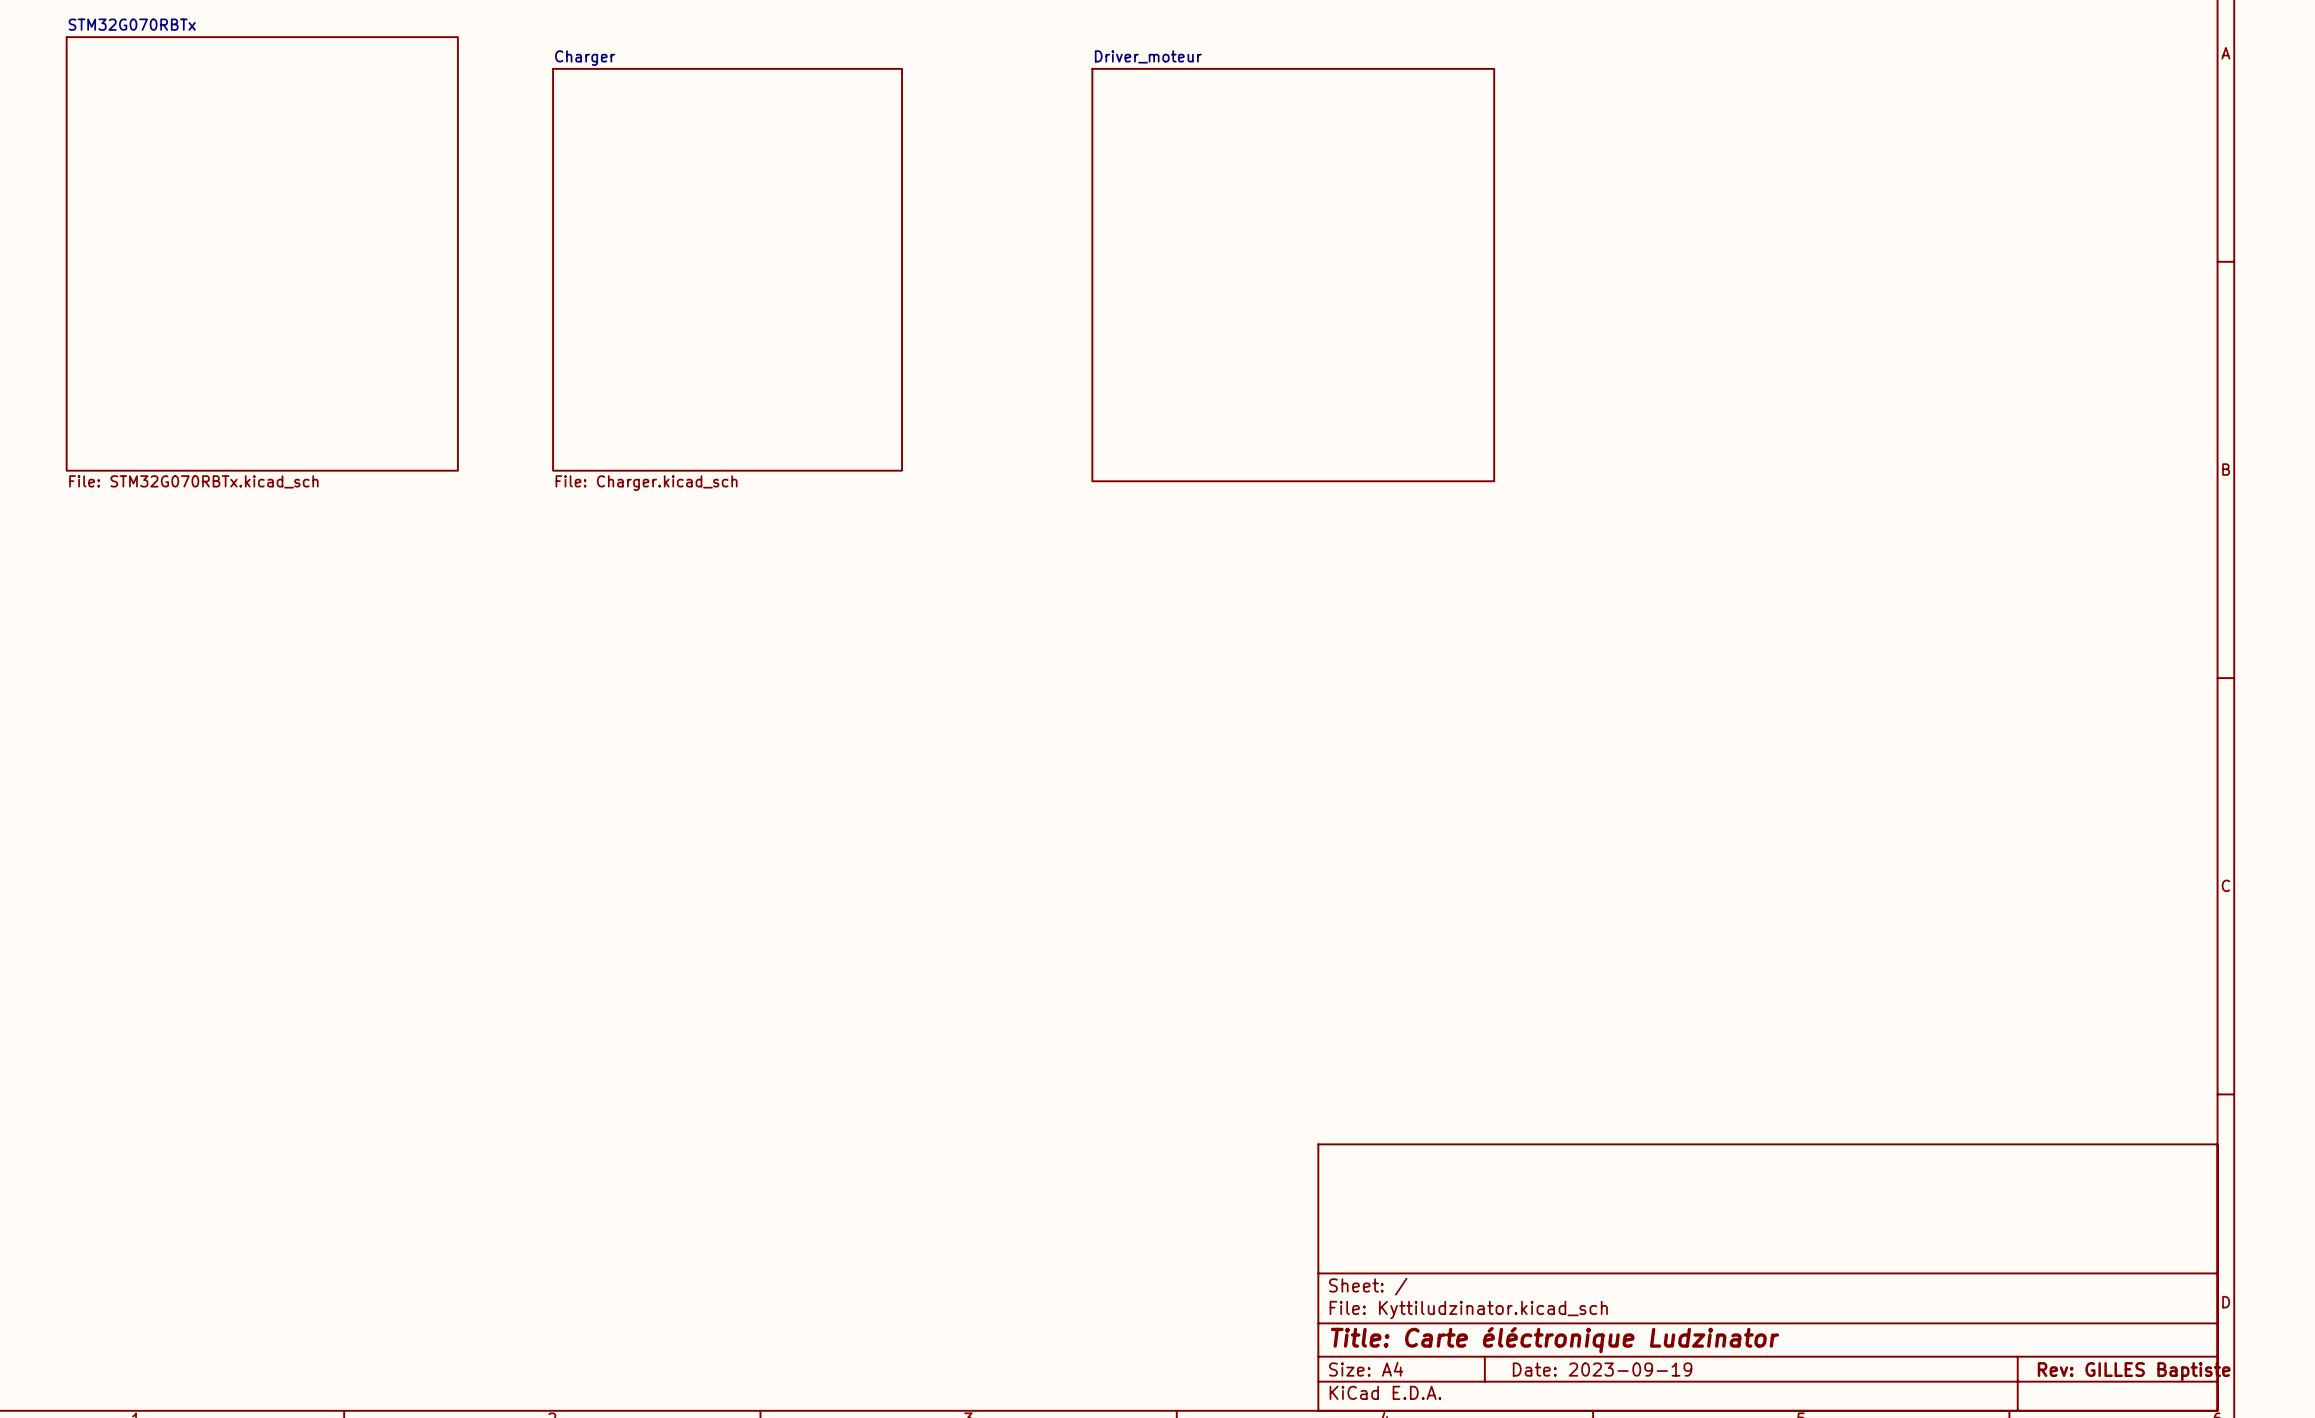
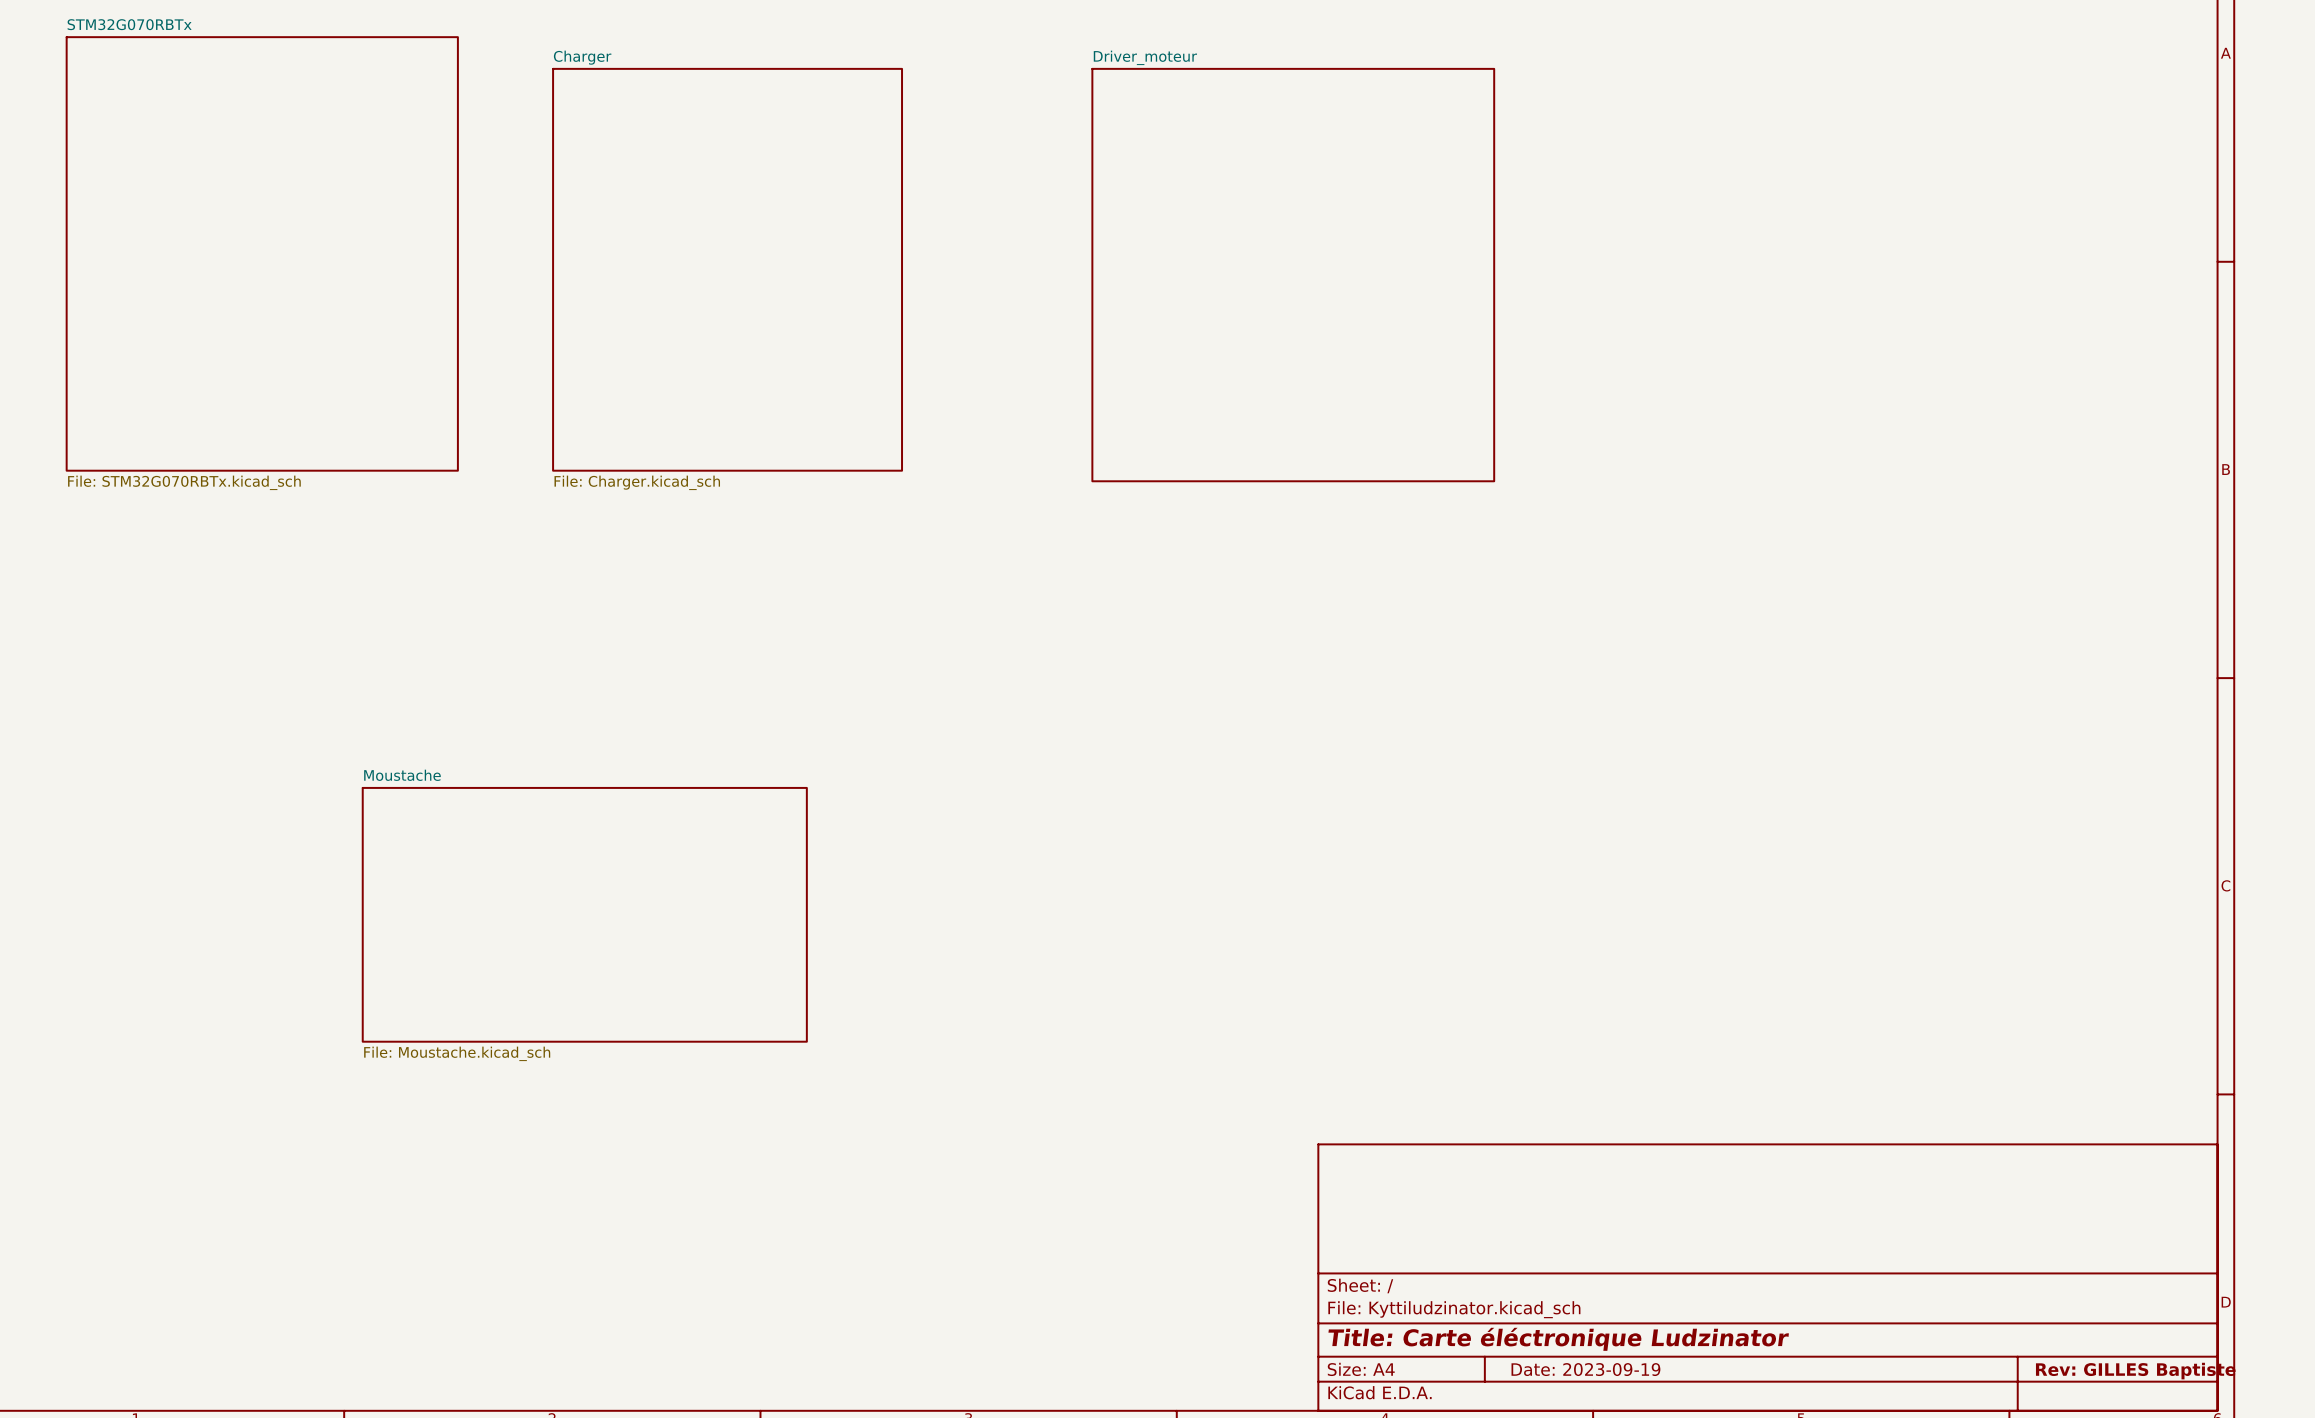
sheet Moustache: none -> File: Moustache.kicad_sch (584, 914)

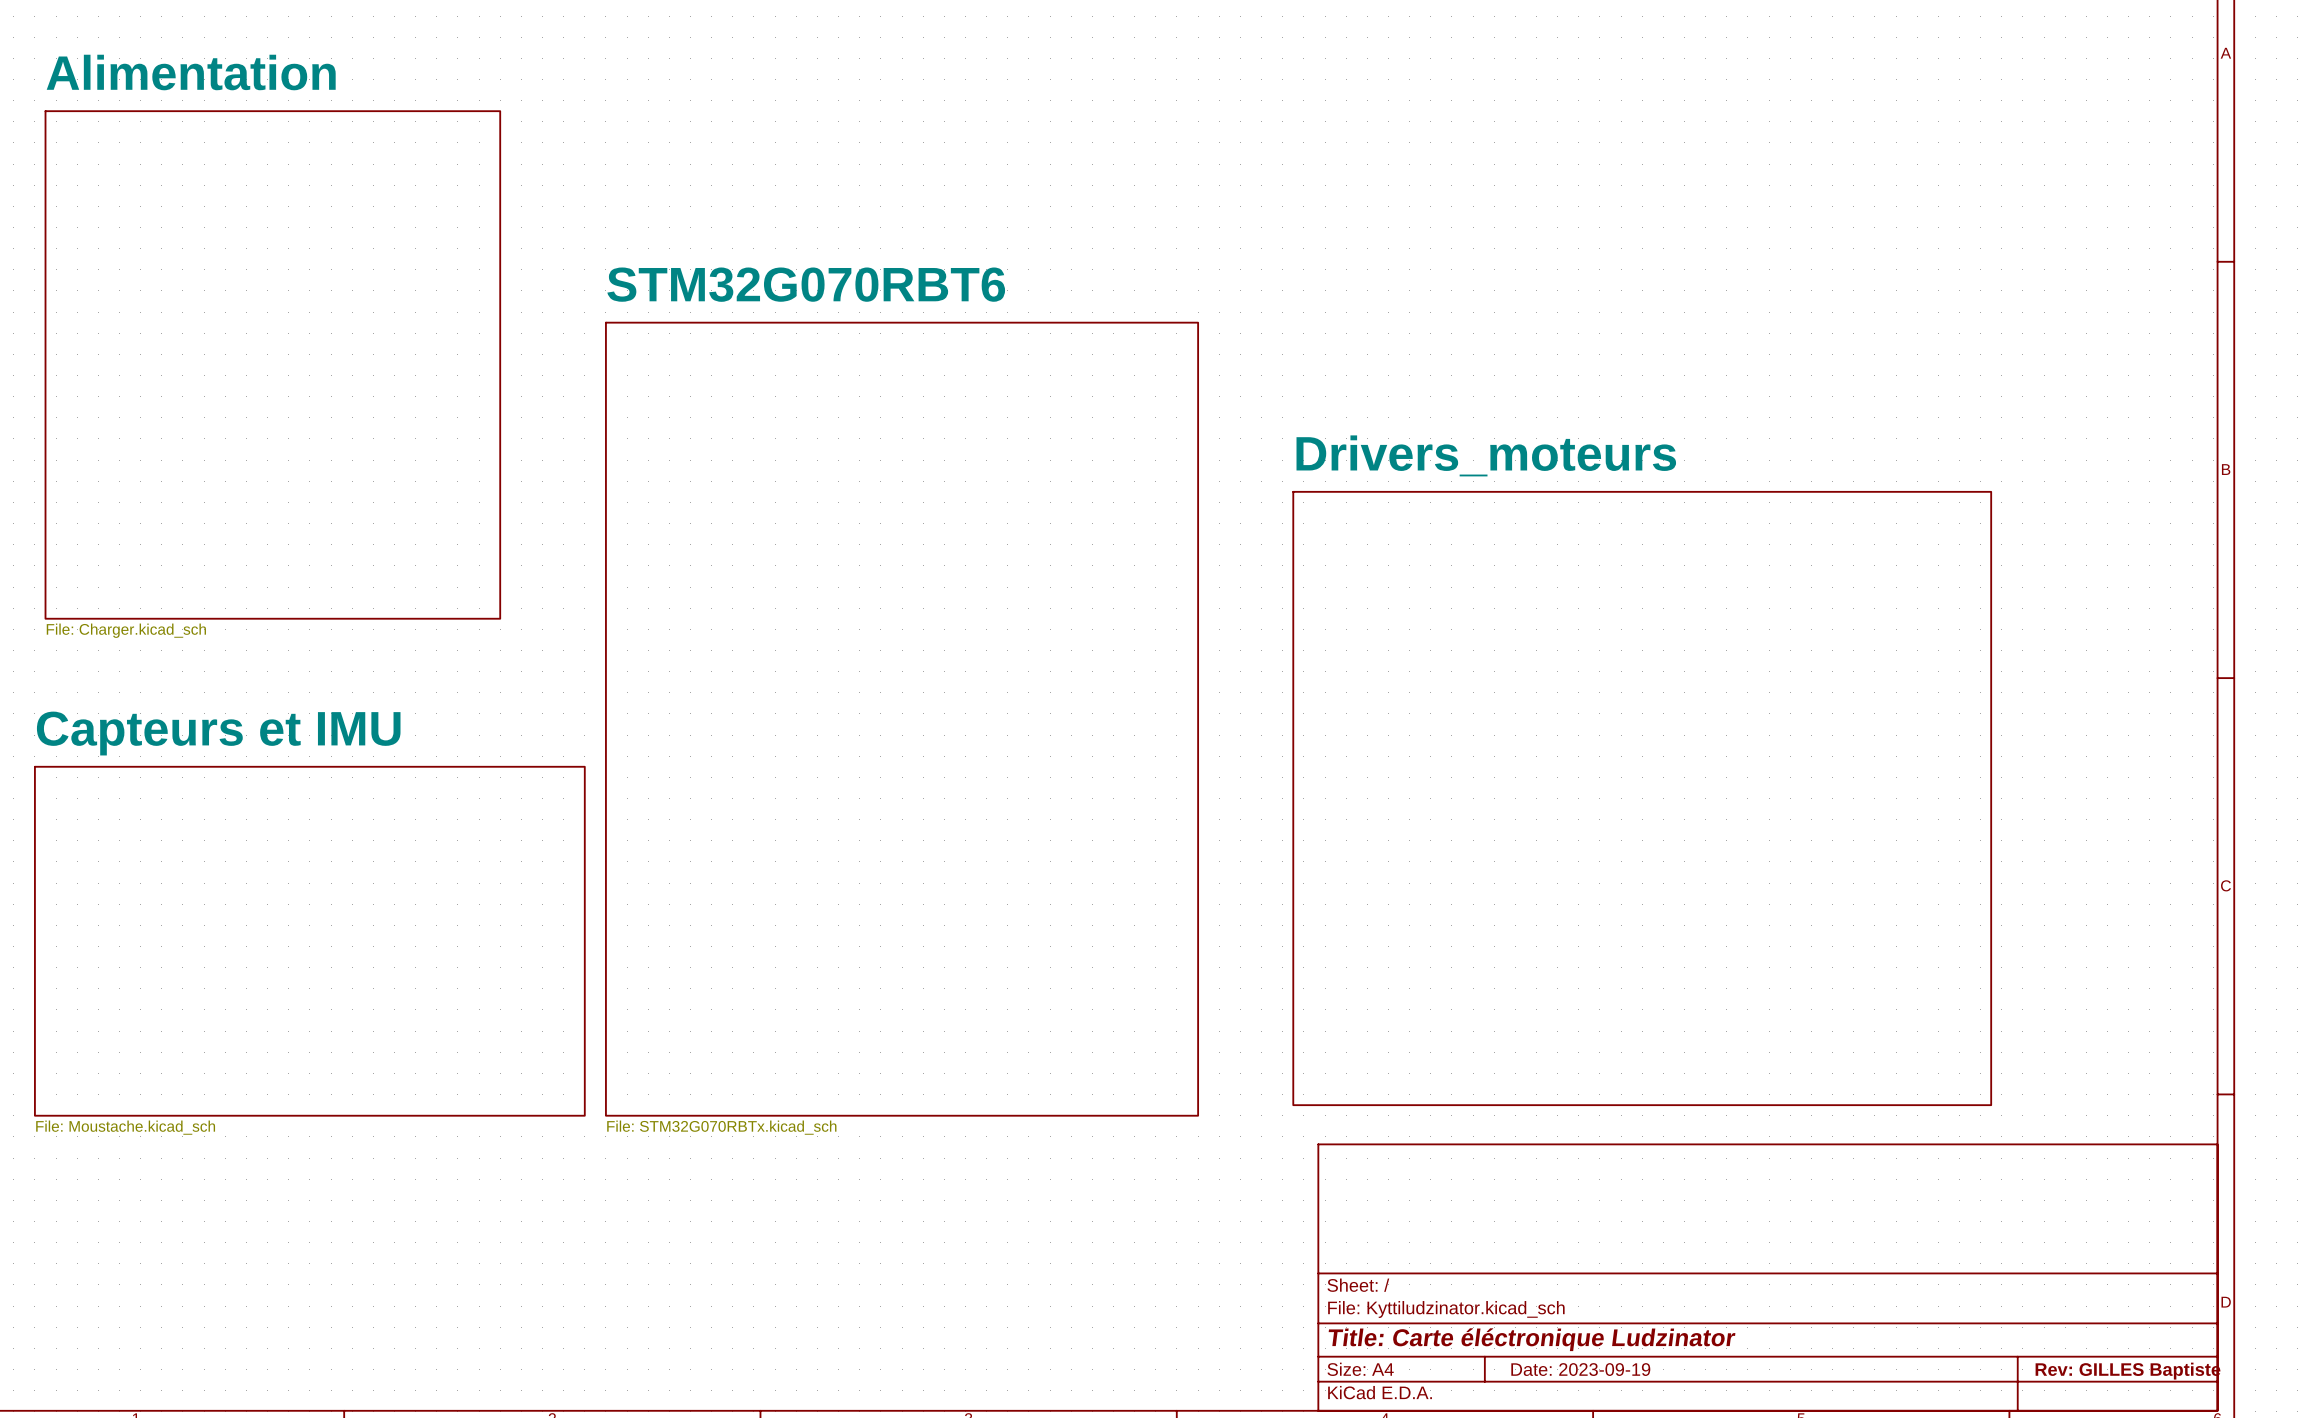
sheet STM32G070RBTx: File: STM32G070RBTx.kicad_sch (262, 253) -> none
sheet Charger: File: Charger.kicad_sch (727, 269) -> none
sheet Driver_moteur: (1293, 275) -> none
sheet Alimentation: none -> File: Charger.kicad_sch (272, 364)
sheet STM32G070RBT6: none -> File: STM32G070RBTx.kicad_sch (902, 719)
sheet Drivers_moteurs: none -> (1642, 798)
sheet Moustache: File: Moustache.kicad_sch (584, 914) -> none
sheet Capteurs et IMU: none -> File: Moustache.kicad_sch (309, 941)

